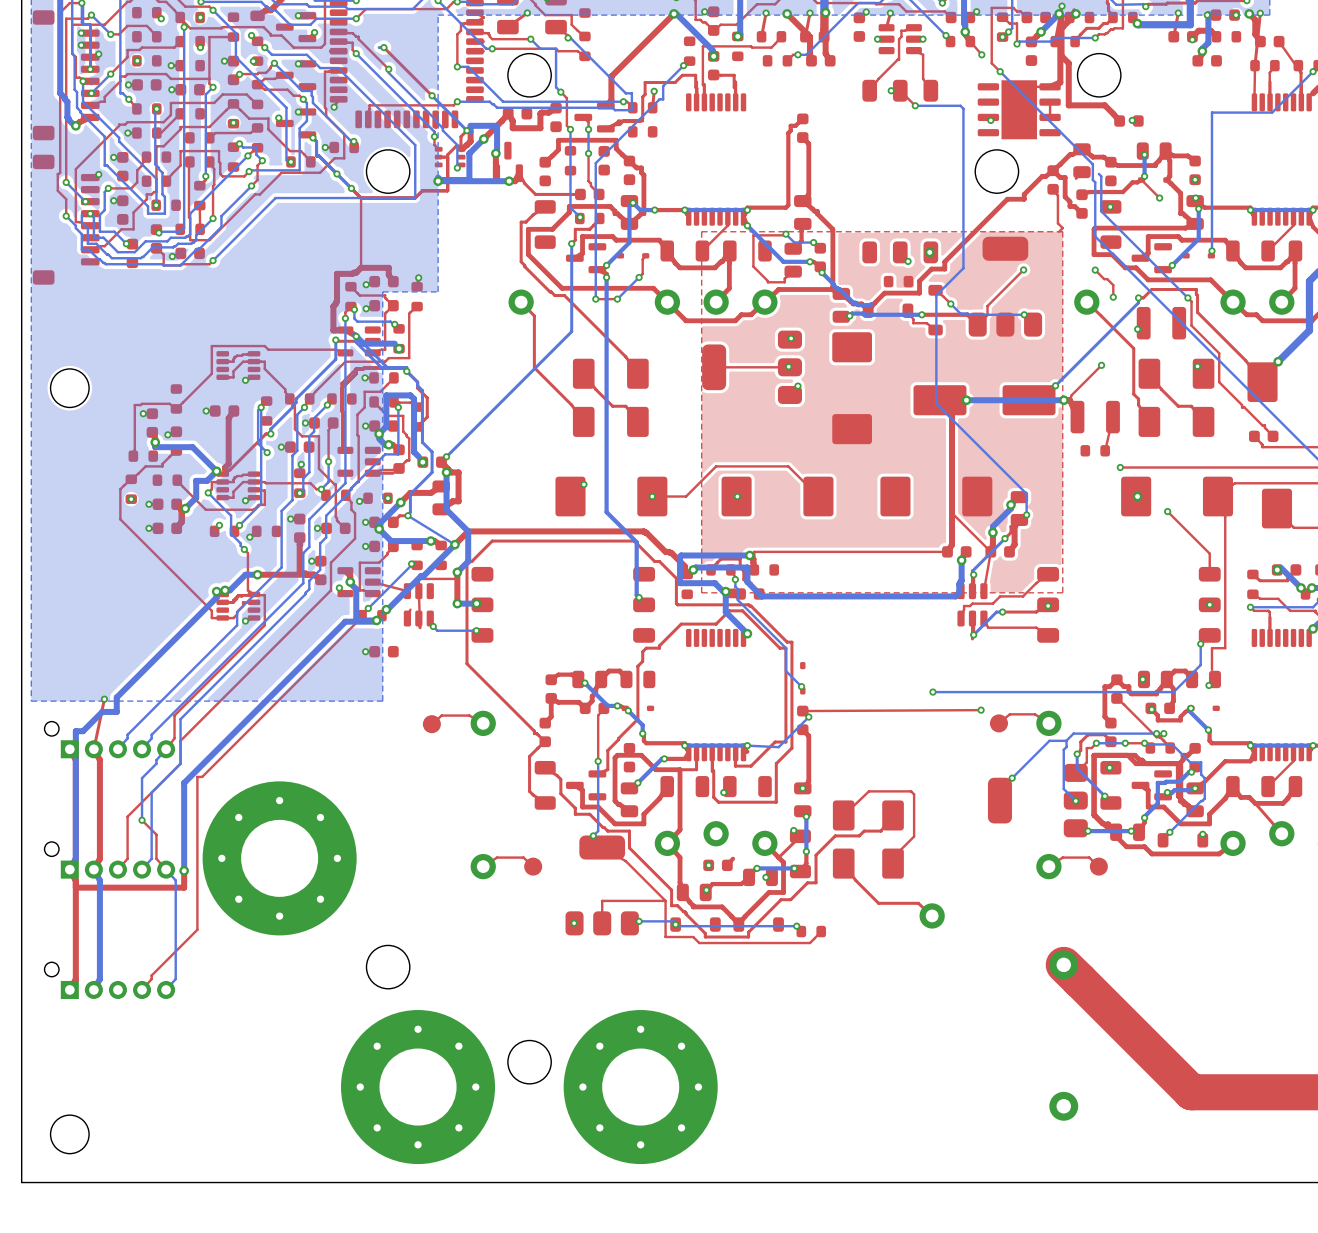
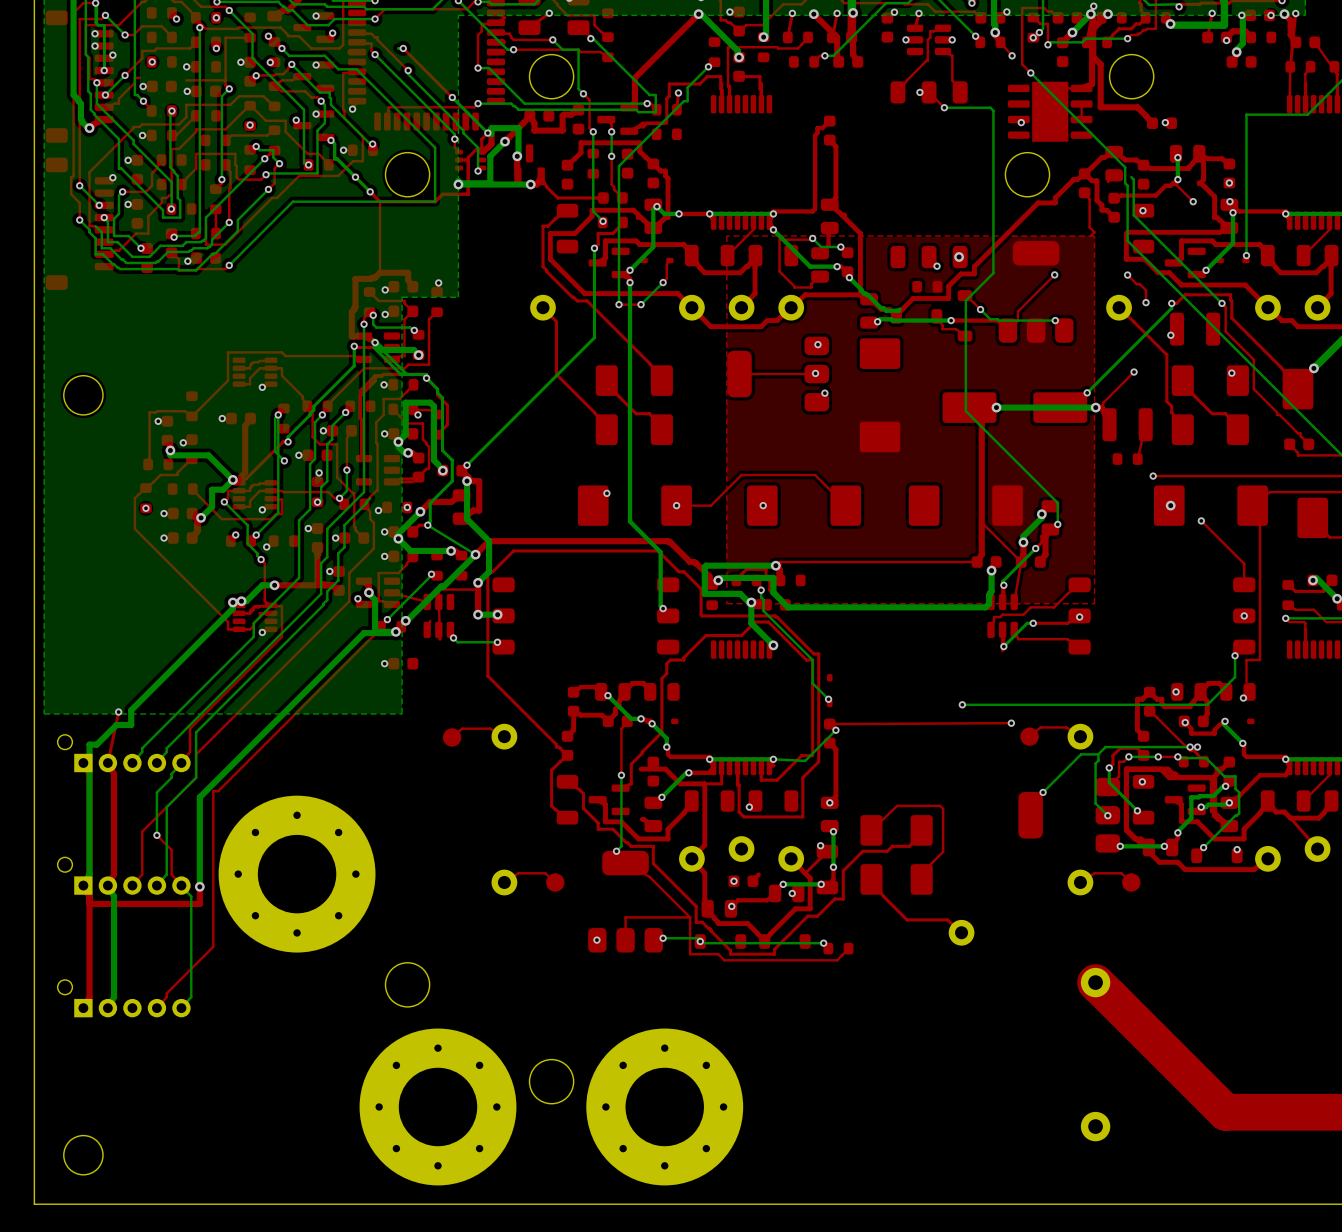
top track: (125, 76) (127, 74) (166, 74) (170, 78) -> none
top track: (189, 161) (190, 218) -> none
bottom track: (81, 214) (81, 222) -> none
bottom track: (398, 407) (398, 454) (385, 454) (351, 489) -> none
top track: (617, 755) (615, 757) (615, 801) (618, 804) -> none

